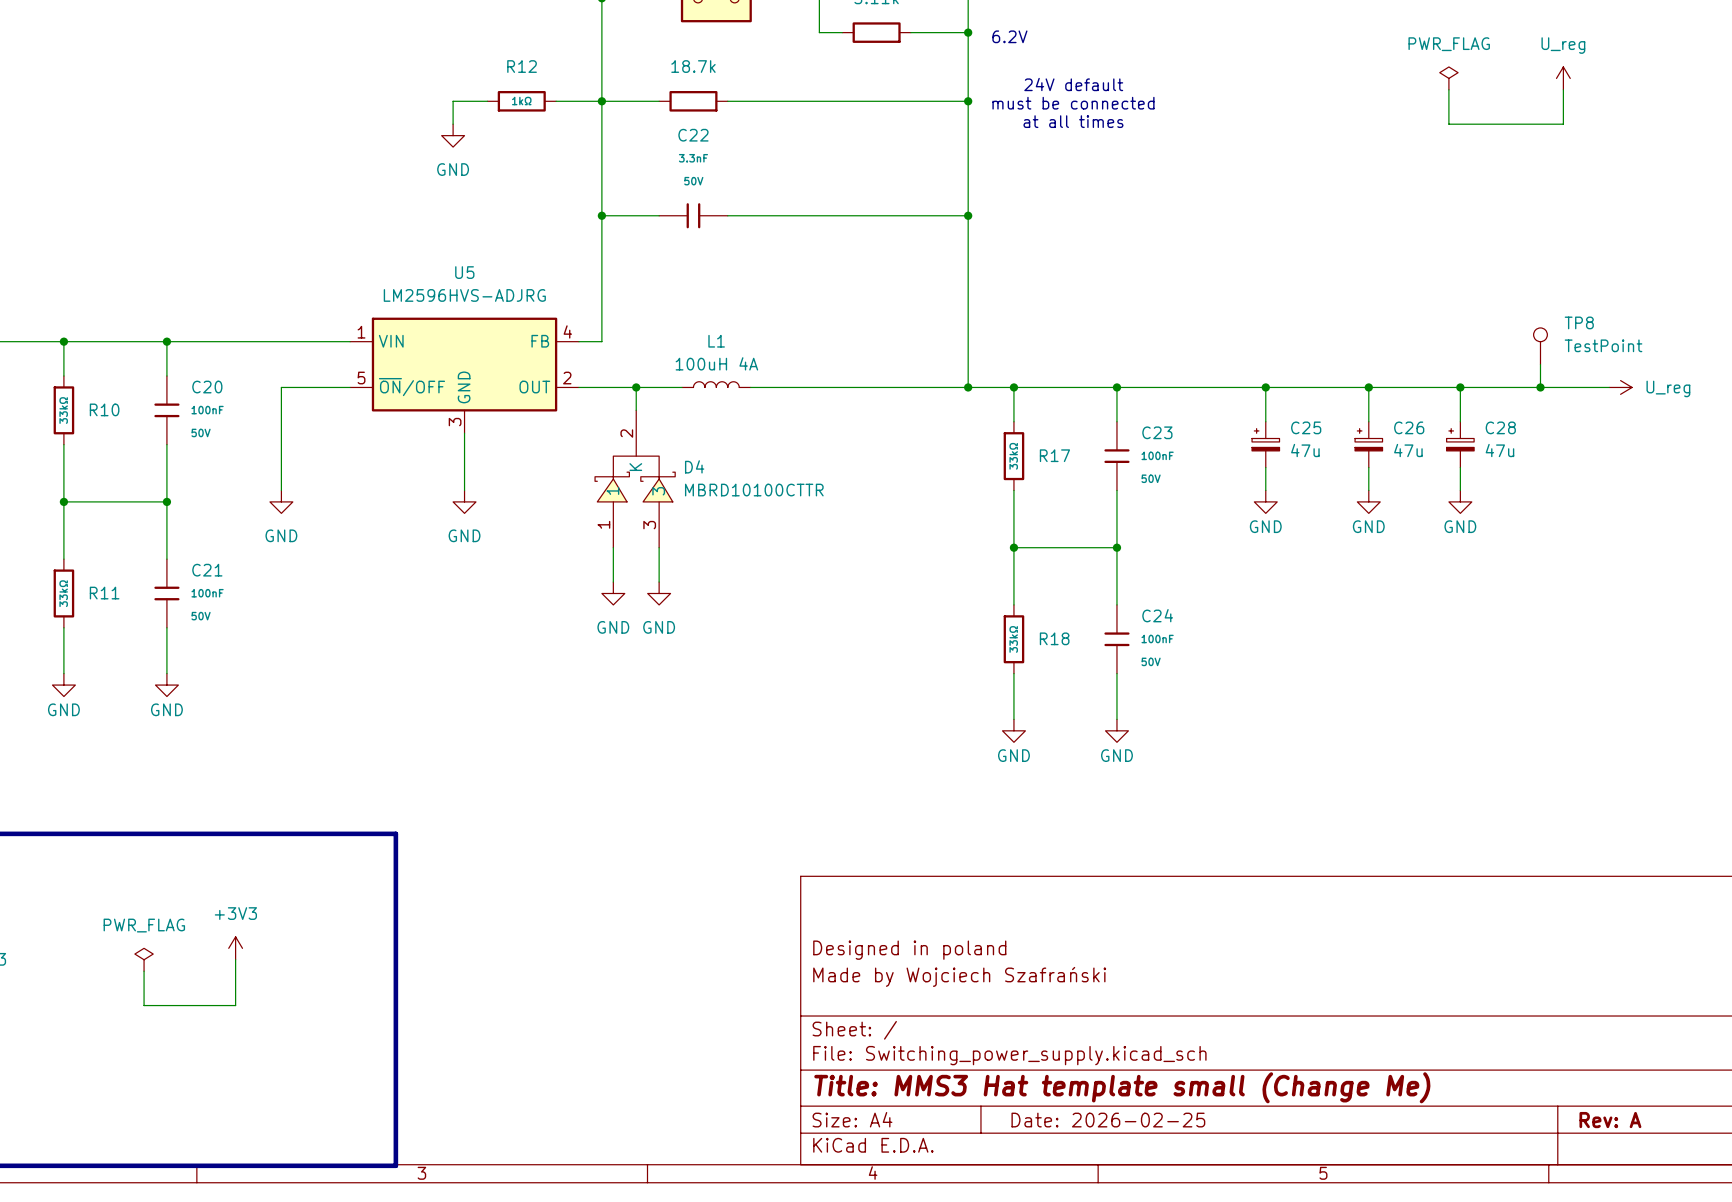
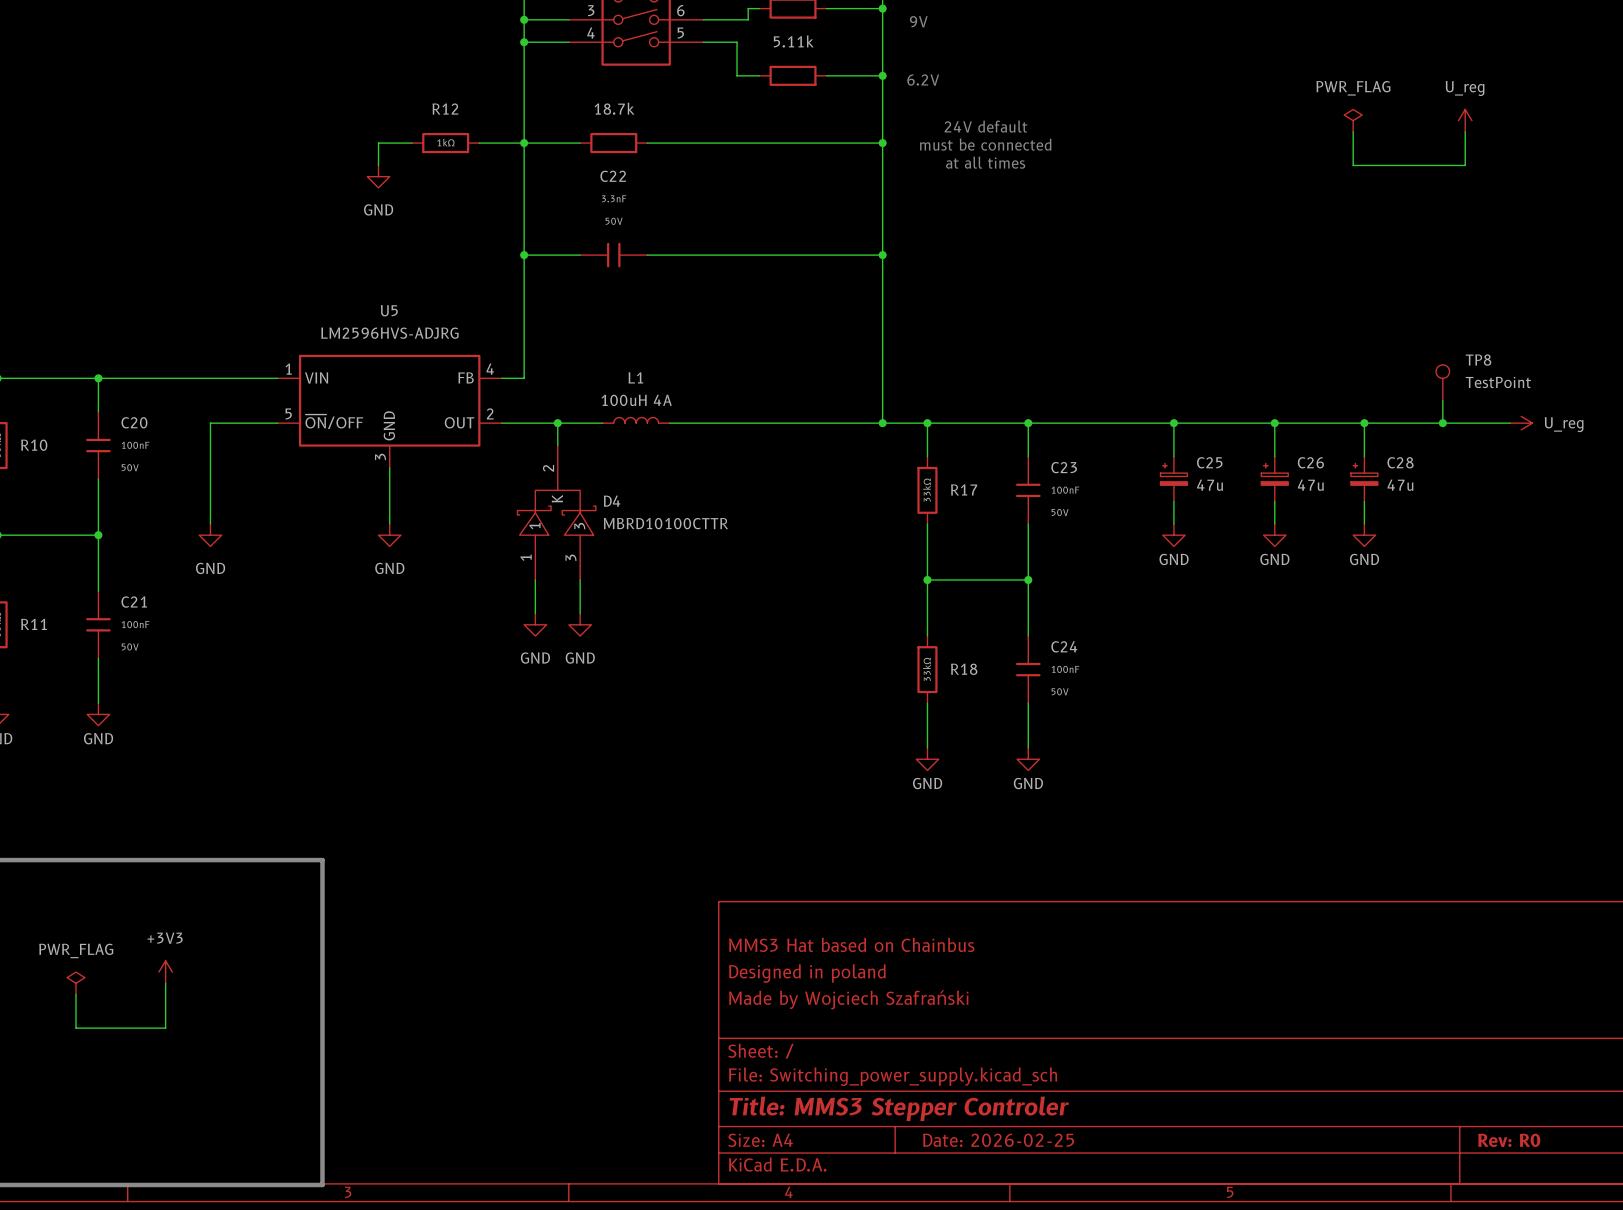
title block: none -> MMS3 Hat based on Chainbus (851, 944)
title block: Title: MMS3 Hat template small (Change Me) (1122, 1087) -> Title: MMS3 Stepper Controler (899, 1108)
title block: Rev: A (1610, 1120) -> Rev: R0 (1509, 1140)

